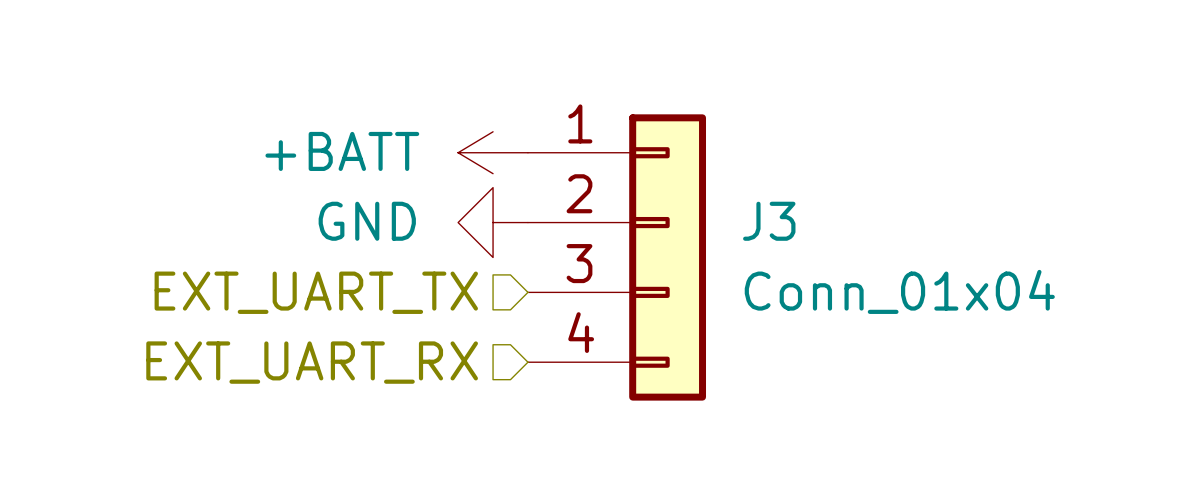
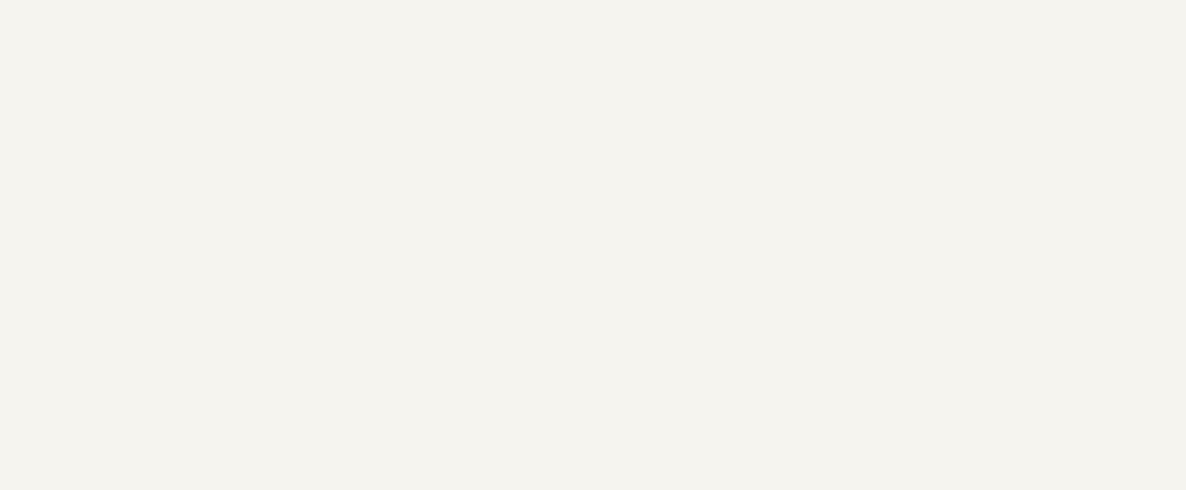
power symbol: +BATT (493, 152) -> none
power symbol: GND (493, 222) -> none
J3: Conn_01x04 (616, 257) -> none
hierarchical label: EXT_UART_TX (316, 292) -> none
hierarchical label: EXT_UART_RX (312, 362) -> none

